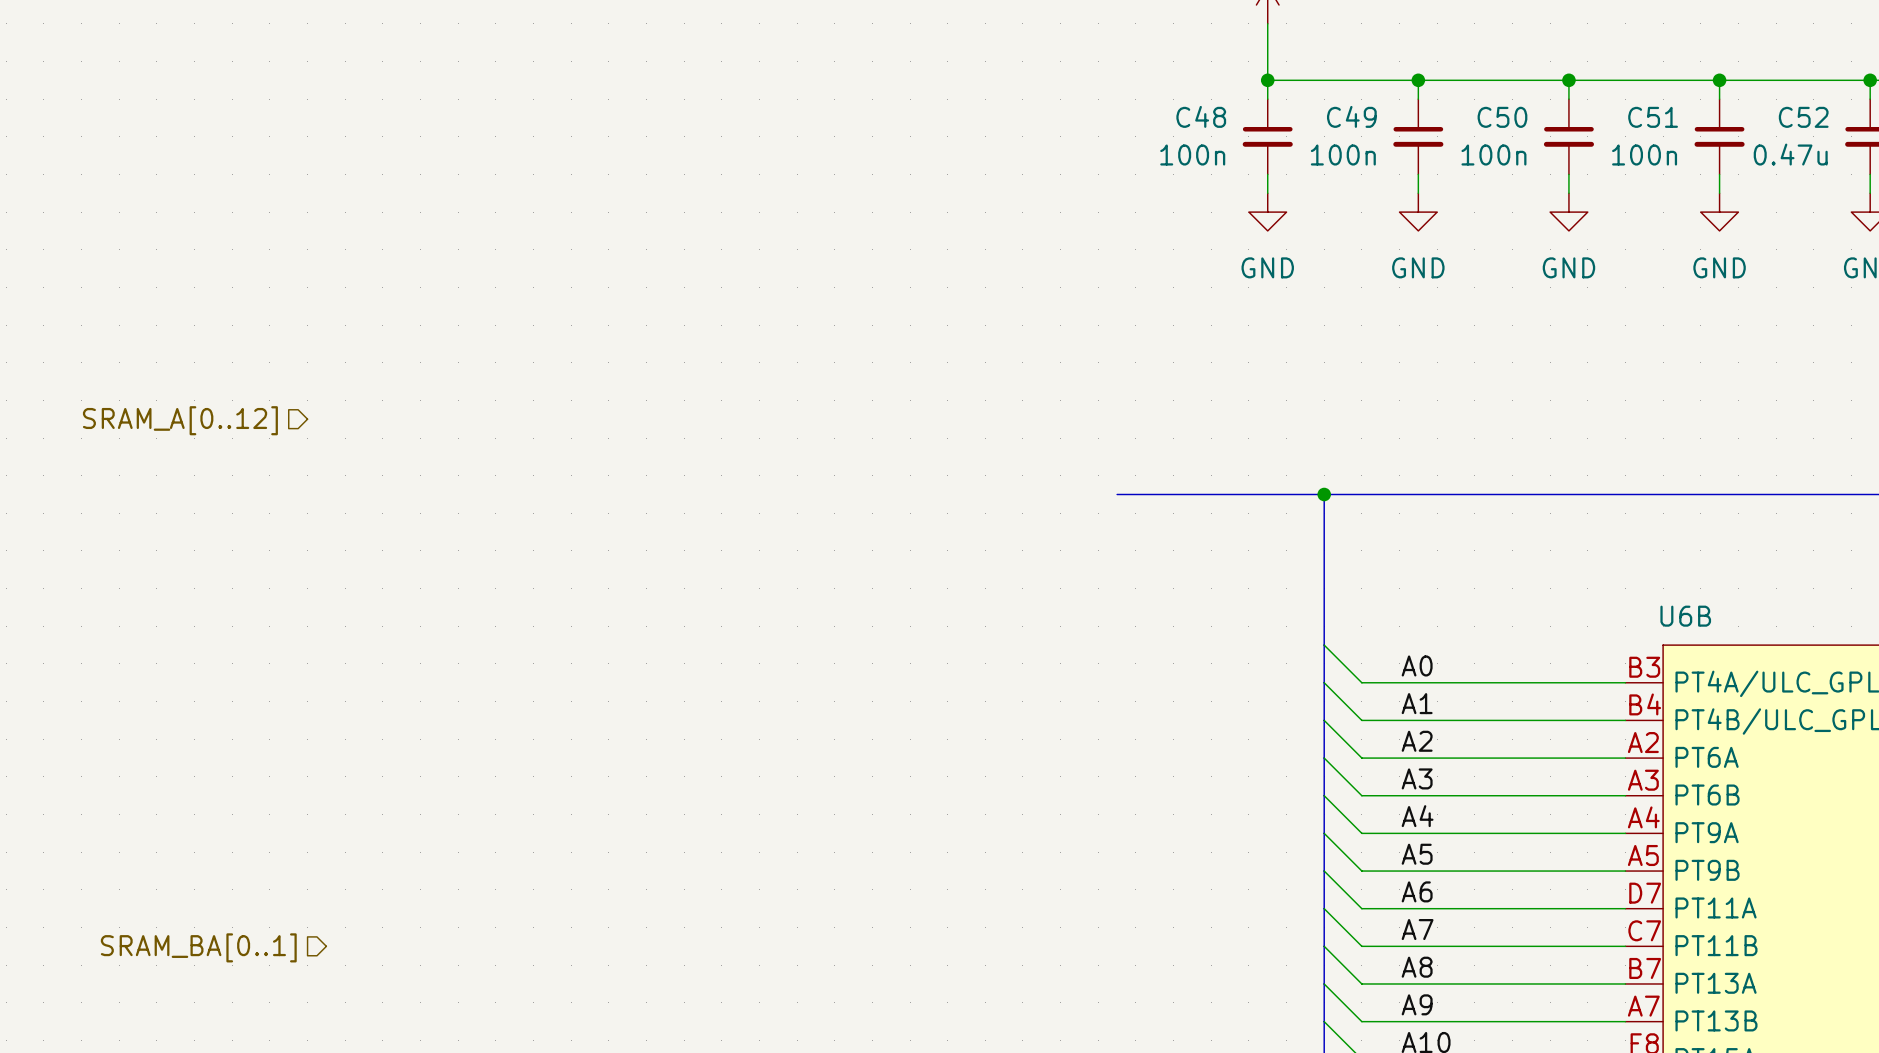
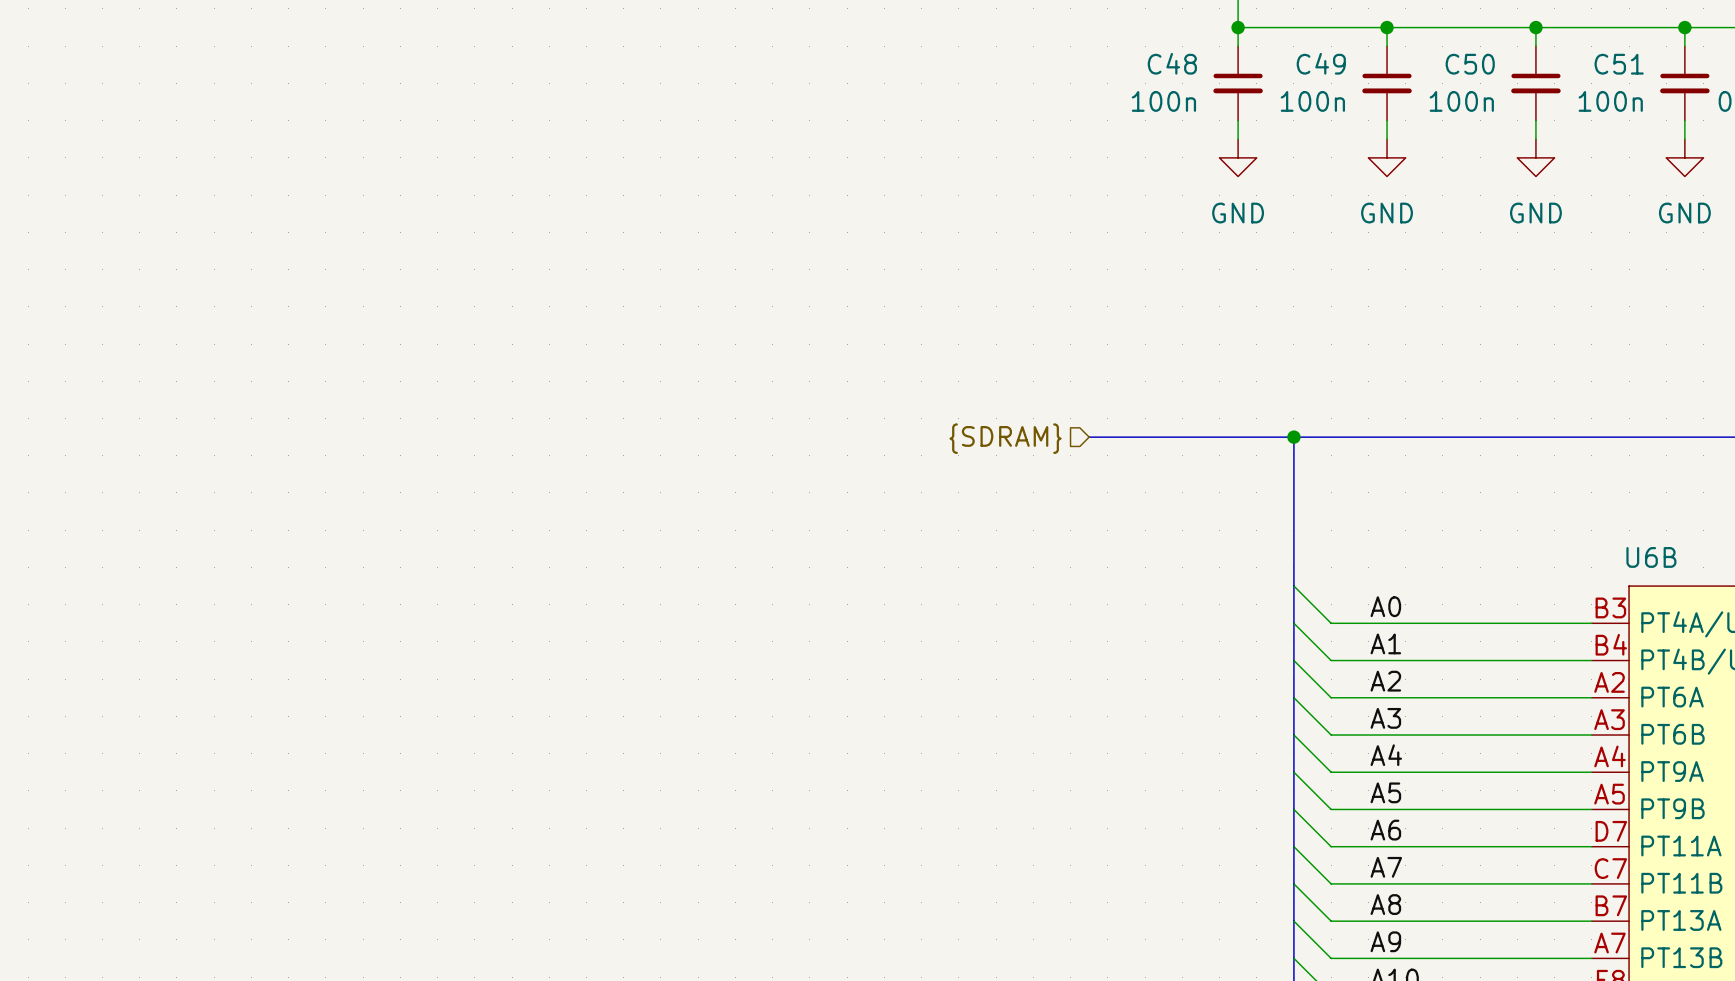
hierarchical label: SRAM_A[0..12] (180, 420) -> none
hierarchical label: none -> {SDRAM} (1005, 438)
hierarchical label: SRAM_BA[0..1] (198, 947) -> none

